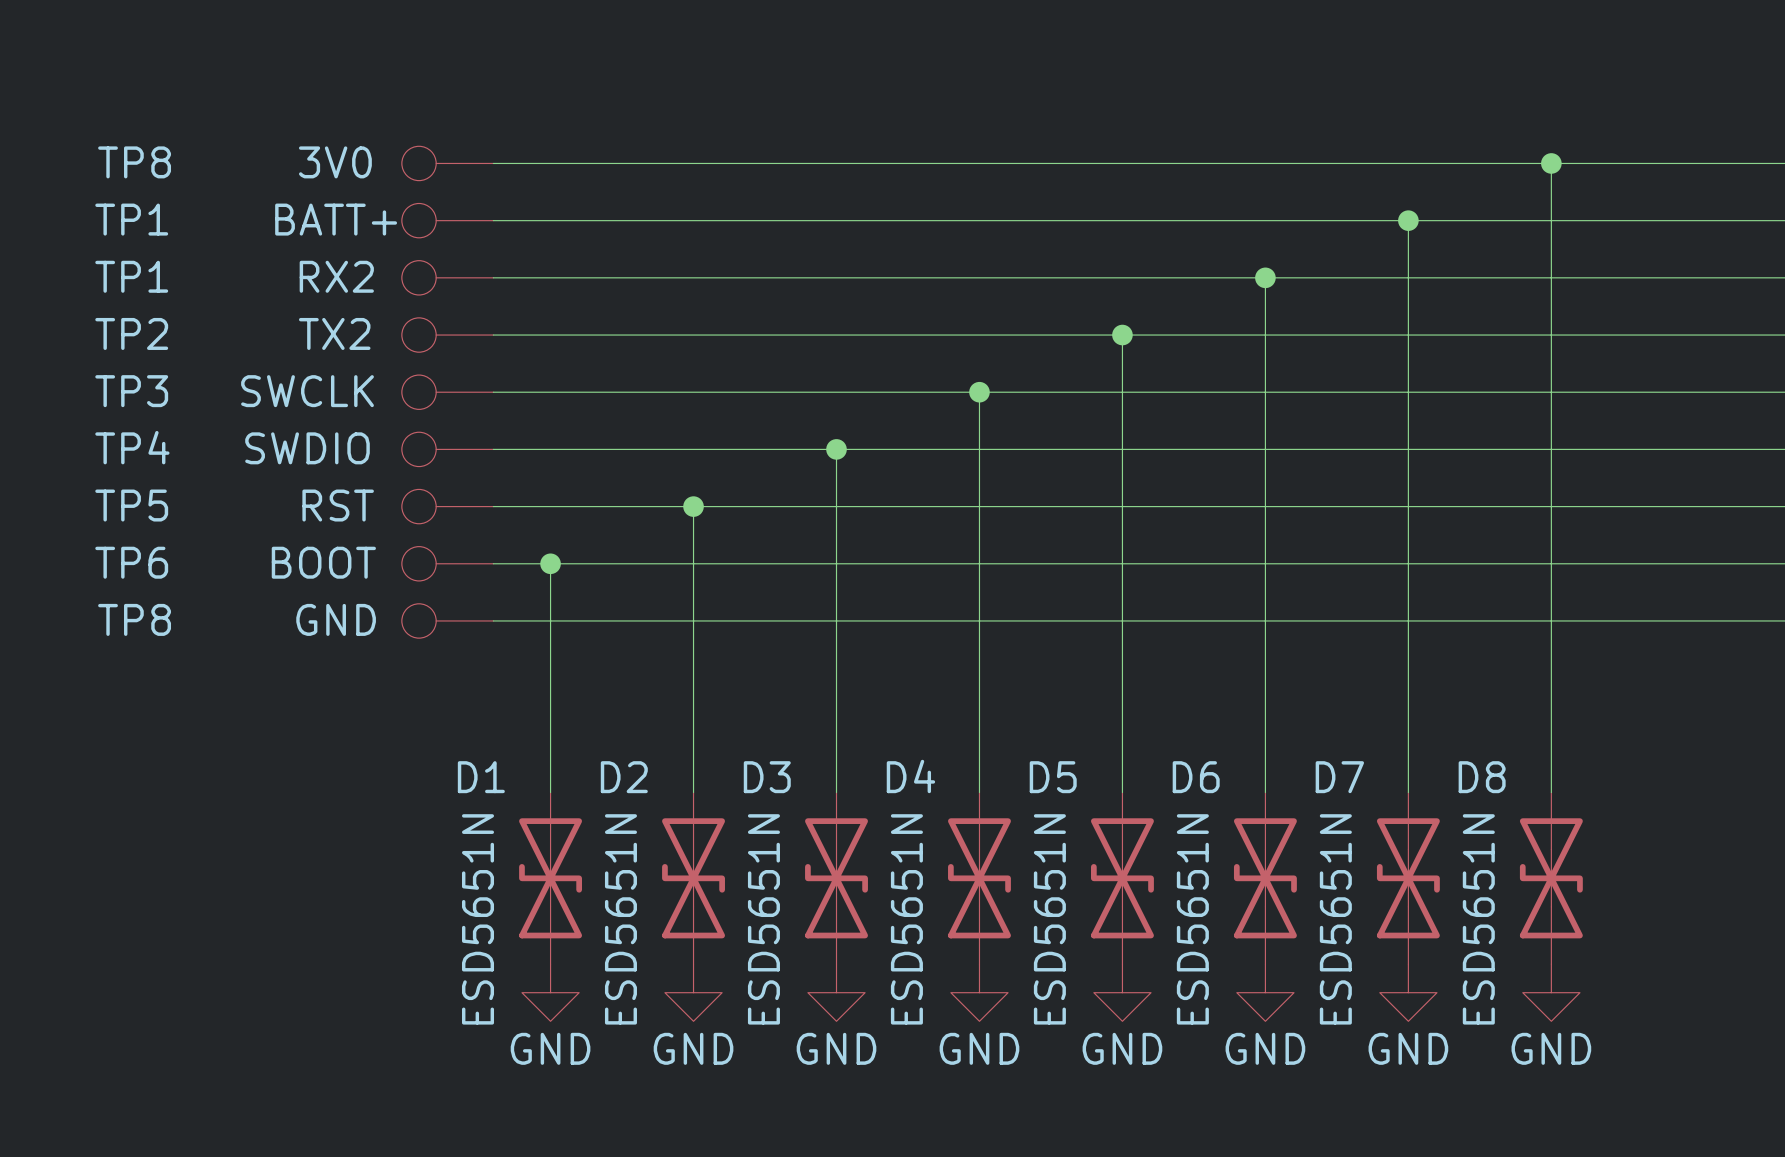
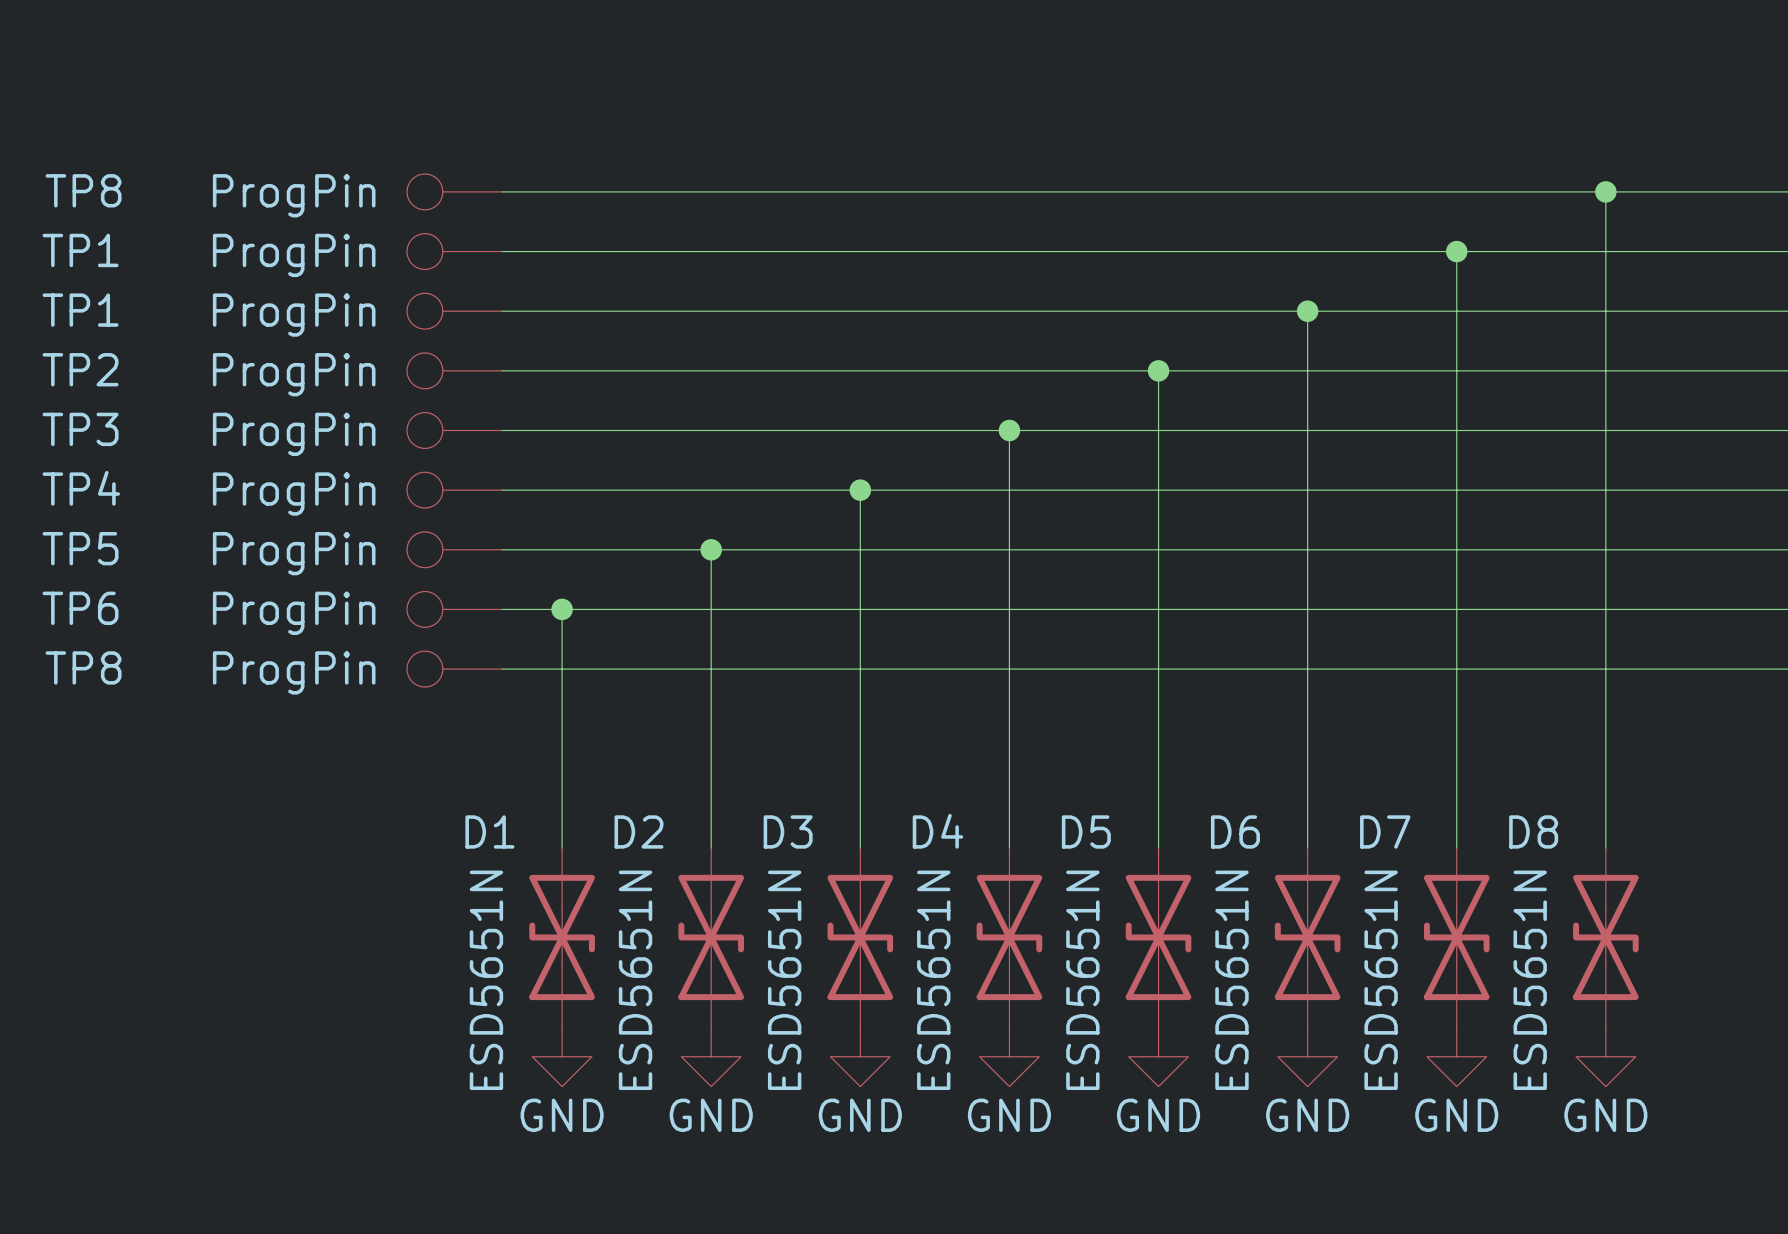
TP8 name position: TP8 (134, 162) -> TP8 (83, 190)
TP8 value: 3V0 (335, 162) -> ProgPin (294, 195)
TP1 name position: TP1 (131, 219) -> TP1 (80, 250)
TP1 value: BATT+ (336, 219) -> ProgPin (294, 255)
TP1 name position: TP1 (131, 276) -> TP1 (80, 310)
TP1 value: RX2 (336, 276) -> ProgPin (294, 315)
TP2 name position: TP2 (131, 333) -> TP2 (80, 369)
TP2 value: TX2 (334, 333) -> ProgPin (294, 374)
TP3 name position: TP3 (131, 391) -> TP3 (80, 429)
TP3 value: SWCLK (307, 391) -> ProgPin (294, 434)
TP4 name position: TP4 (132, 447) -> TP4 (81, 488)
TP4 value: SWDIO (307, 448) -> ProgPin (294, 494)
TP5 name position: TP5 (131, 505) -> TP5 (80, 548)
TP5 value: RST (338, 505) -> ProgPin (294, 553)
TP6 name position: TP6 (131, 562) -> TP6 (80, 608)
TP6 value: BOOT (323, 562) -> ProgPin (294, 613)
TP8 name position: TP8 (134, 619) -> TP8 (83, 667)
TP8 value: GND (336, 619) -> ProgPin (294, 672)

